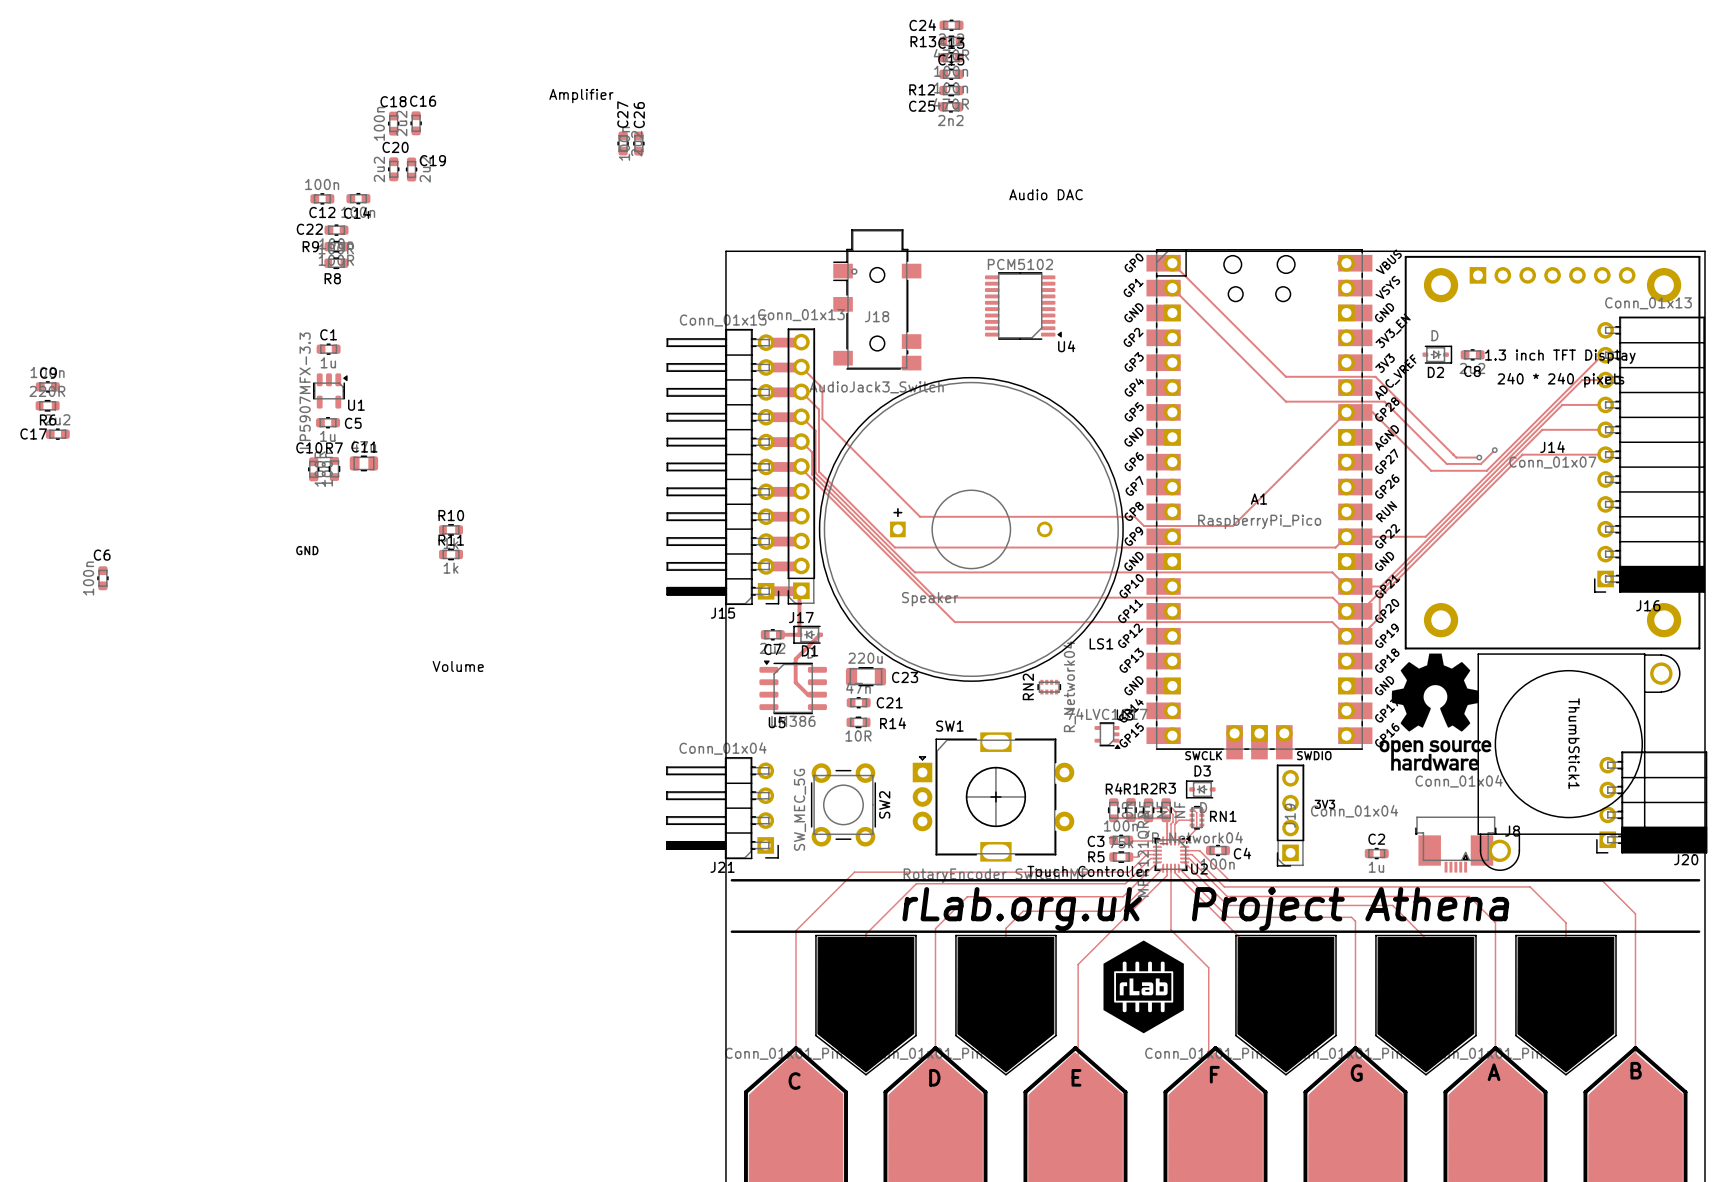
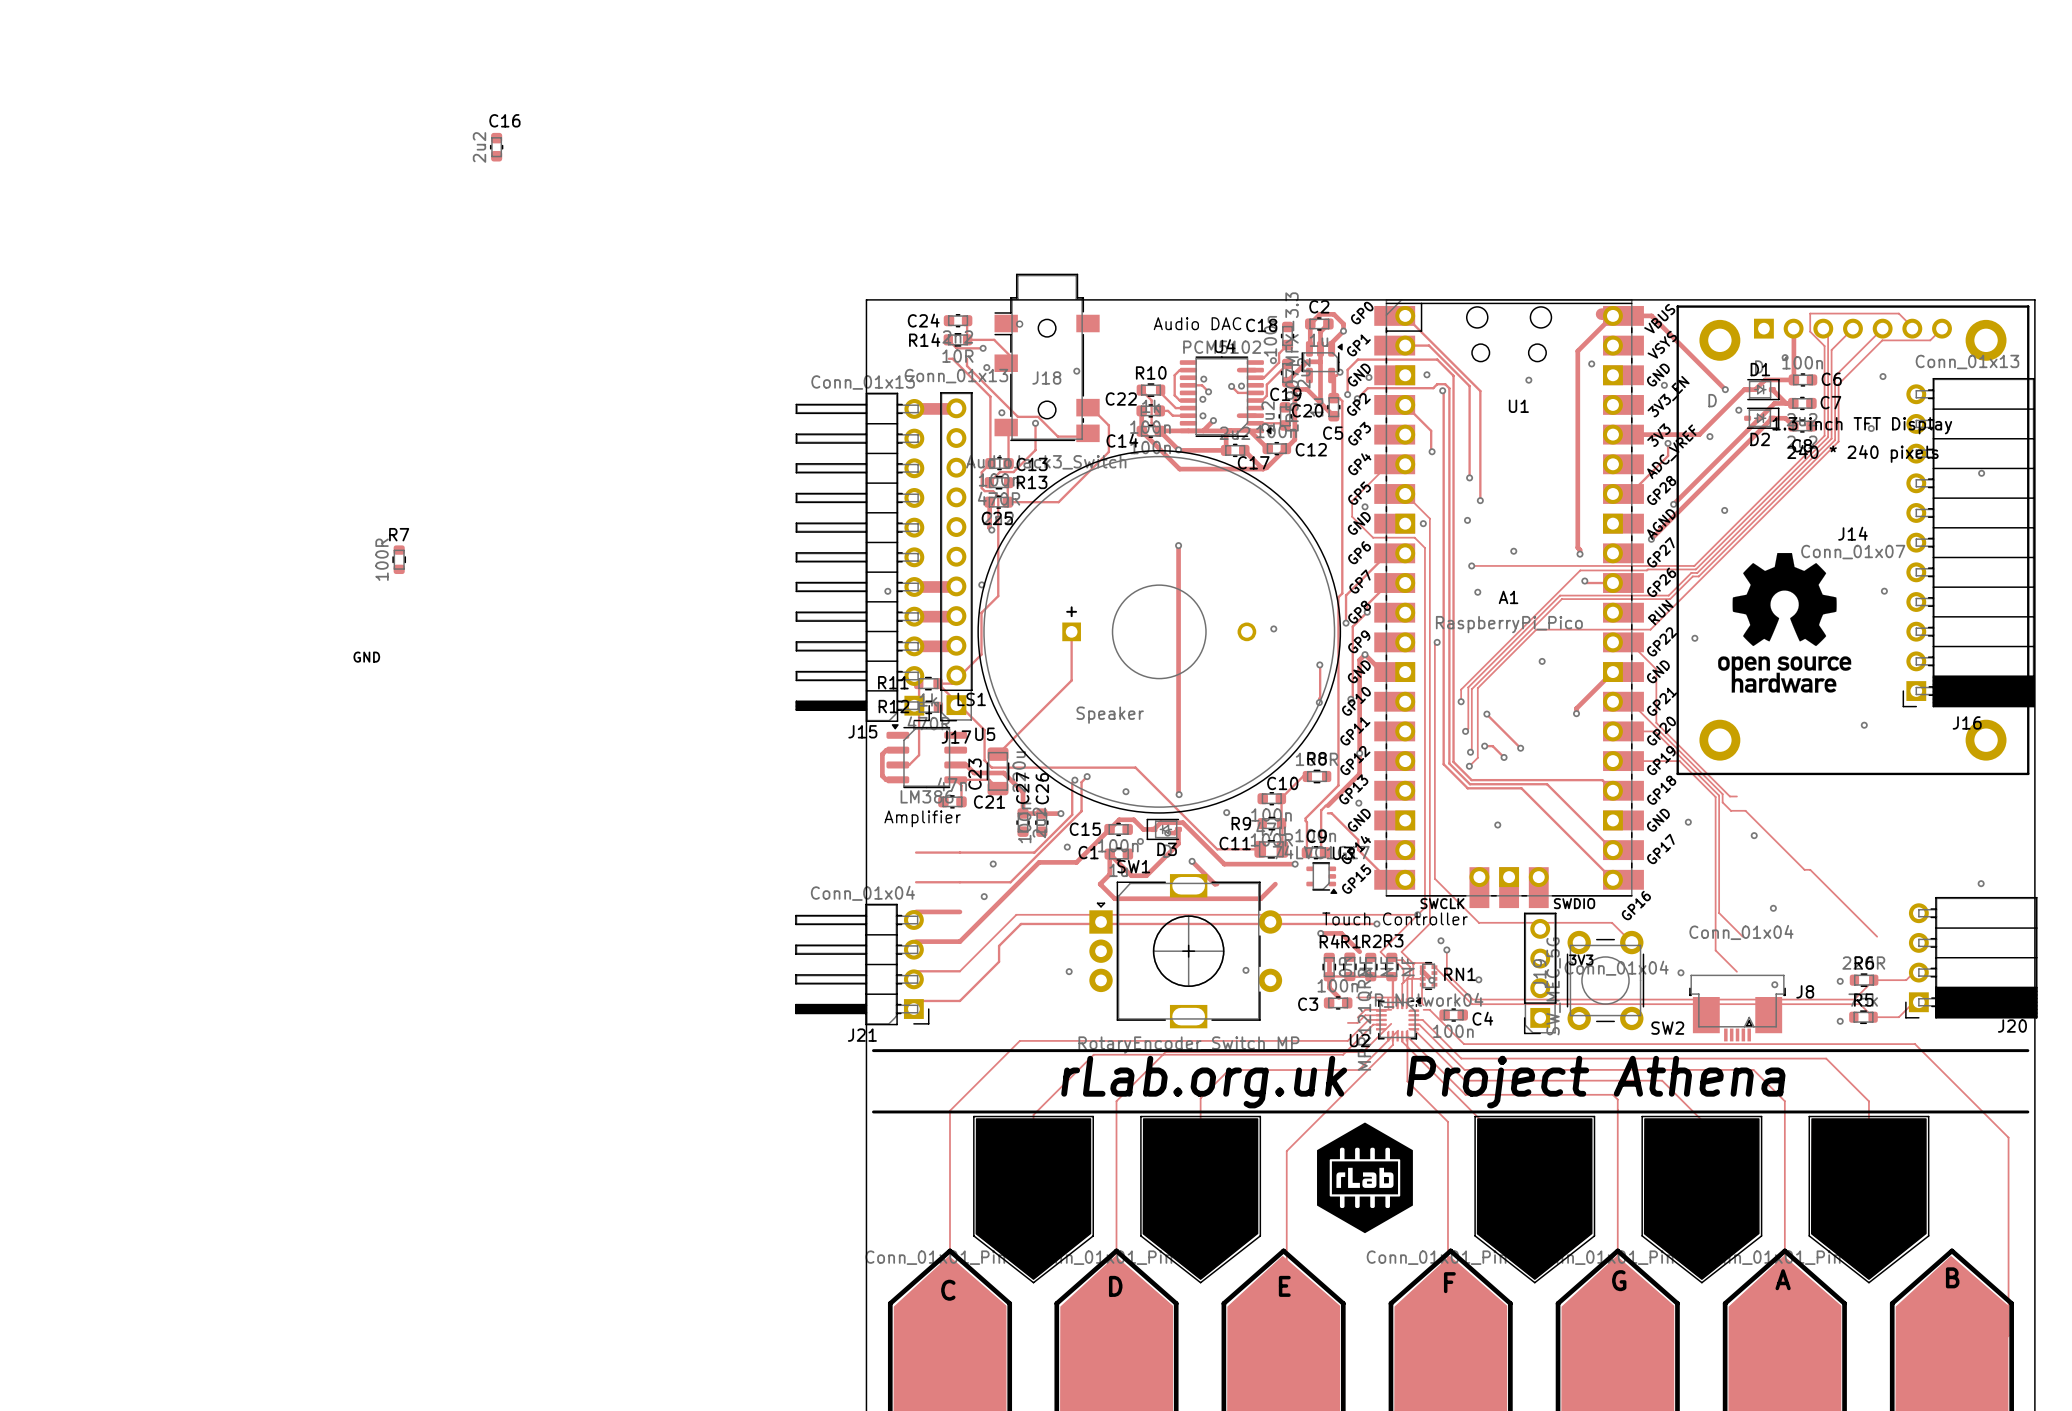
C24 position: (951, 25) -> (958, 320)
R13 name position: R13 (923, 41) -> R13 (1032, 482)
R13 position: (951, 41) -> (999, 482)
C13 name position: C13 (951, 43) -> C13 (1032, 464)
C13 position: (951, 57) -> (999, 463)
C15 name position: C15 (951, 59) -> C15 (1085, 829)
C15 position: (951, 74) -> (1118, 829)
R12 position: (951, 90) -> (928, 707)
text: Amplifier (581, 96) -> none
C18 name position: C18 (393, 101) -> C18 (1261, 325)
C25 name position: C25 (922, 106) -> C25 (997, 518)
C25 position: (951, 106) -> (998, 502)
C18 position: (393, 123) -> (1287, 336)
C27 position: (623, 143) -> (1023, 822)
C26 position: (638, 143) -> (1041, 822)
C20 name position: C20 (395, 147) -> C20 (1307, 410)
C19 name position: C19 (432, 160) -> C19 (1285, 394)
C20 position: (393, 169) -> (1285, 416)
C19 position: (411, 169) -> (1287, 373)
text position: Audio DAC (1046, 194) -> Audio DAC (1197, 323)
C12 position: (322, 198) -> (1276, 448)
C14 position: (358, 198) -> (1150, 431)
C12 name position: C12 (322, 212) -> C12 (1311, 449)
C14 name position: C14 (357, 213) -> C14 (1122, 440)
C22 name position: C22 (309, 229) -> C22 (1121, 399)
C22 position: (336, 230) -> (1150, 410)
R9 position: (336, 246) -> (1271, 823)
A1 footprint: [1146, 249, 1373, 760] -> [1374, 299, 1644, 909]
R8 position: (336, 263) -> (1317, 776)
track: (1172, 263) (1285, 376) (1375, 376) (1456, 457) (1479, 457) -> none
track: none -> (1405, 315) (1480, 391) (1480, 500)
track: none -> (967, 320) (967, 339) (994, 339) (1012, 358) (1012, 366)
track: none -> (1328, 323) (1320, 331) (1320, 402)
track: none -> (1794, 327) (1793, 379) (1765, 379) (1755, 389) (1744, 389) (1699, 434) (1612, 434)
track: none -> (1824, 327) (1828, 331) (1828, 437) (1695, 569) (1580, 570) (1461, 689) (1461, 701)
track: none -> (1853, 327) (1831, 350) (1831, 438) (1697, 572) (1691, 572) (1668, 595) (1560, 595) (1468, 687) (1468, 728) (1465, 731)
track: none -> (1883, 327) (1835, 376) (1835, 440) (1698, 576) (1692, 576) (1670, 599) (1561, 599) (1471, 689) (1470, 752)
track: none -> (1913, 327) (1898, 313) (1810, 313) (1810, 331) (1824, 346) (1824, 435) (1694, 565) (1471, 565)
track: none -> (1942, 327) (1930, 340) (1882, 340) (1838, 384) (1838, 441) (1650, 629) (1536, 629) (1477, 688) (1477, 757) (1469, 766)
via: none -> (1343, 331)
R8 name position: R8 (332, 278) -> R8 (1317, 758)
track: none -> (948, 339) (956, 348) (983, 348)
track: (1172, 288) (1285, 401) (1384, 401) (1446, 463) (1480, 463) (1494, 450) -> none
track: none -> (1287, 345) (1279, 353) (1279, 362) (1263, 377) (1255, 377)
track: none -> (1405, 345) (1429, 345) (1469, 386) (1469, 477)
via: none -> (983, 348)
track: none -> (1309, 348) (1310, 323) (1319, 314) (1333, 314) (1343, 323) (1343, 331) (1331, 343) (1331, 348)
via: none -> (1785, 357)
track: none -> (948, 358) (952, 358) (990, 396) (990, 463) (981, 472) (981, 488) (984, 491) (993, 491) (998, 496) (998, 596) (981, 612) (981, 654) (952, 683) (938, 683) (984, 730) (984, 760) (991, 767) (1135, 767) (1217, 849) (1260, 849)
track: none -> (966, 358) (966, 365) (1017, 416) (1038, 416) (1057, 436) (1094, 436)
via: none -> (1273, 360)
track: none -> (1320, 361) (1307, 361) (1287, 381) (1294, 389)
track: none -> (1287, 363) (1266, 384) (1266, 395) (1262, 400) (1255, 400)
via: none -> (1591, 363)
U4 position: (1023, 305) -> (1225, 396)
via: none -> (986, 367)
track: none -> (1188, 370) (1179, 370) (1174, 375) (1174, 395) (1179, 400) (1188, 400)
track: none -> (1239, 370) (1255, 370)
via: none -> (1076, 371)
track: none -> (1340, 372) (1336, 375) (1331, 375) (1333, 377) (1333, 398)
via: none -> (1340, 372)
via: none -> (1426, 374)
via: none -> (1882, 376)
via: none -> (1369, 377)
via: none -> (1203, 379)
via: none -> (1528, 380)
track: none -> (1188, 385) (1202, 385) (1208, 391)
via: none -> (1664, 385)
track: none -> (1231, 386) (1238, 392) (1255, 392)
via: none -> (1231, 386)
via: none -> (1241, 386)
track: none -> (1141, 390) (1151, 400) (1151, 422) (1159, 431)
track: none -> (1160, 390) (1160, 392) (1175, 408) (1188, 408)
track: none -> (1294, 389) (1294, 439) (1266, 467) (1261, 467) (1244, 450)
track: none -> (1294, 389) (1307, 389) (1333, 416)
track: none -> (1725, 389) (1651, 315) (1612, 315) (1577, 351) (1577, 547) (1580, 554)
via: none -> (1725, 389)
track: none -> (1772, 389) (1786, 403)
track: none -> (1442, 390) (1443, 764) (1467, 788) (1521, 788) (1612, 879)
via: none -> (1442, 390)
via: none -> (1208, 391)
track: none -> (1347, 394) (1347, 369) (1357, 359) (1437, 359) (1453, 375) (1453, 761) (1471, 780) (1602, 780) (1612, 790)
via: none -> (1347, 394)
track: none -> (1333, 398) (1339, 398) (1342, 401) (1342, 593) (1338, 597) (1338, 785) (1305, 818) (1306, 852)
C1 name position: C1 (328, 334) -> C1 (1088, 852)
via: none -> (1202, 399)
track: none -> (1357, 398) (1367, 388) (1433, 388) (1437, 384) (1445, 384) (1449, 388) (1449, 763) (1470, 784) (1547, 784) (1612, 850)
via: none -> (1357, 398)
track: none -> (1405, 404) (1431, 430) (1432, 451)
track: none -> (1791, 405) (1793, 403) (1774, 403) (1673, 504)
via: none -> (1738, 410)
track: none -> (1094, 410) (1108, 425) (1108, 451) (1058, 502) (1007, 502) (1008, 482)
track: none -> (1141, 410) (1141, 431) (1179, 469) (1264, 467)
track: none -> (1159, 410) (1168, 410) (1172, 415) (1188, 415)
via: none -> (1001, 412)
U4 name position: U4 (1066, 346) -> U4 (1225, 346)
via: none -> (1202, 415)
track: none -> (1239, 415) (1255, 415)
C1 position: (328, 349) -> (1118, 854)
track: none -> (1213, 420) (1203, 430)
via: none -> (1213, 420)
track: none -> (1035, 423) (1035, 450) (1013, 472) (999, 472) (989, 482)
via: none -> (1035, 423)
track: none -> (1255, 423) (1283, 423) (1285, 425)
D2 position: (1437, 354) -> (1761, 418)
C8 position: (1472, 354) -> (1802, 425)
track: (1605, 355) (1602, 355) (1486, 470) (1431, 470) (1372, 412) (1346, 412) (1232, 525) (1144, 525) (1134, 516) (920, 516) (822, 419) (822, 388) (801, 367) (766, 367) -> none
track: none -> (1793, 425) (1785, 418) (1772, 418) (1651, 539)
via: none -> (1871, 428)
track: none -> (1012, 430) (1008, 434) (1008, 463)
track: none -> (1159, 431) (1179, 450) (1226, 450) (1226, 434) (1229, 430) (1249, 430) (1267, 448)
track: none -> (1229, 430) (1159, 431)
via: none -> (1709, 436)
track: none -> (1668, 443) (1668, 455) (1630, 493) (1612, 493)
via: none -> (1668, 443)
via: none -> (1178, 449)
via: none -> (1432, 451)
track: (1605, 380) (1582, 380) (1425, 536) (1346, 536) (1335, 547) (894, 547) (818, 471) (818, 409) (801, 391) (766, 392) -> none
C9 position: (47, 386) -> (1316, 852)
track: none -> (1405, 464) (1388, 464) (1352, 500) (1352, 516) (1373, 537) (1414, 537) (1424, 547) (1424, 907) (1380, 951) (1388, 960) (1403, 960) (1409, 966) (1409, 975) (1407, 978) (1407, 998)
U1 position: (330, 390) -> (1322, 362)
via: none -> (1981, 473)
via: none -> (1469, 477)
track: (1605, 404) (1562, 404) (1380, 586) (1346, 586) (1332, 572) (914, 572) (815, 473) (815, 430) (801, 416) (766, 417) -> none
R6 position: (47, 405) -> (1864, 980)
U1 name position: U1 (356, 405) -> U1 (1518, 406)
track: none -> (1405, 493) (1429, 518) (1429, 923) (1401, 951) (1413, 963) (1412, 998)
R6 name position: R6 (48, 419) -> R6 (1864, 963)
via: none -> (1480, 500)
track: none -> (989, 502) (989, 527) (991, 530)
C5 rotation: 0° (328, 422) -> 90° clockwise (1333, 407)
C5 position: (328, 422) -> (1333, 407)
via: none -> (1673, 504)
via: none -> (1365, 506)
via: none -> (1724, 510)
track: (1605, 429) (1542, 429) (1360, 611) (1346, 611) (1332, 597) (935, 597) (812, 474) (812, 452) (801, 441) (766, 442) -> none
C17 name position: C17 (33, 433) -> C17 (1253, 462)
C17 position: (57, 434) -> (1235, 450)
via: none -> (1467, 520)
via: none -> (1423, 523)
via: none -> (991, 530)
C11 name position: C11 (364, 447) -> C11 (1235, 843)
via: (1494, 450) -> none
via: none -> (1651, 539)
track: (1605, 454) (1522, 454) (1379, 597) (1379, 617) (1360, 636) (1346, 636) (1332, 622) (954, 622) (801, 466) (766, 466) -> none
track: none -> (1178, 545) (1179, 794)
via: none -> (1178, 545)
via: (1479, 457) -> none
via: none -> (1513, 551)
C11 position: (363, 463) -> (1271, 849)
track: none -> (1405, 553) (1388, 553) (1346, 595) (1346, 623)
via: none -> (1580, 554)
C10 rotation: 0° (313, 469) -> 90° clockwise (1271, 798)
C10 position: (313, 469) -> (1271, 798)
via: none -> (1471, 565)
track: none -> (1584, 581) (1586, 583) (1612, 583)
via: none -> (1584, 581)
track: none -> (1405, 583) (1388, 583) (1367, 604) (1367, 612) (1352, 626) (1352, 697) (1350, 699)
via: none -> (981, 584)
via: none -> (887, 591)
via: none -> (1884, 591)
via: none -> (1477, 592)
via: none -> (1367, 612)
via: none -> (1346, 623)
via: none -> (1273, 628)
R10 position: (451, 529) -> (1150, 390)
track: none -> (1071, 631) (1071, 680) (998, 754)
via: none -> (1694, 638)
track: none -> (1437, 642) (1434, 644) (1434, 878) (1478, 922) (1612, 922) (1631, 942)
via: none -> (1437, 642)
track: none -> (1612, 642) (1629, 642) (1656, 669) (1656, 722) (1729, 796) (1736, 796)
R11 name position: R11 (451, 540) -> R11 (893, 682)
via: none -> (1365, 654)
R11 position: (451, 554) -> (928, 683)
via: none -> (1542, 661)
track: none -> (1319, 664) (1319, 702)
via: none -> (1319, 664)
track: none -> (1405, 672) (1382, 672) (1365, 654) (1359, 660) (1359, 773) (1321, 810) (1321, 848) (1325, 852)
track: none -> (1612, 672) (1576, 708) (1576, 713)
track: (801, 565) (766, 566) -> none
track: none -> (918, 683) (919, 755) (909, 764) (897, 764)
C6 rotation: 0° (102, 578) -> 90° clockwise (1802, 379)
C6 position: (102, 578) -> (1802, 379)
via: none -> (1350, 699)
via: none -> (1461, 701)
track: none -> (1612, 701) (1630, 701) (1722, 794) (1722, 802) (1731, 810) (1745, 810) (1804, 869) (1810, 869) (1877, 936)
via: none -> (1319, 702)
track: (766, 591) (801, 590) (799, 592) (799, 634) (780, 634) -> none
via: none -> (1576, 713)
track: none -> (1486, 714) (1520, 748)
via: none -> (1486, 714)
via: none -> (1864, 725)
via: none -> (1465, 731)
track: none -> (1612, 731) (1654, 731) (1719, 795) (1719, 913) (1742, 936)
track: none -> (1484, 746) (1492, 746) (1504, 757)
via: none -> (1484, 746)
via: none -> (1520, 748)
track: none -> (897, 750) (886, 750) (882, 754) (882, 775) (886, 779) (897, 779)
via: none -> (1470, 752)
via: none -> (1359, 753)
C7 position: (772, 634) -> (1802, 403)
D1 rotation: 0° (808, 634) -> 180° (1761, 389)
D1 position: (808, 634) -> (1761, 389)
track: (820, 634) (795, 659) (795, 682) (807, 694) (817, 694) -> none
via: none -> (1504, 757)
track: none -> (1612, 761) (1679, 761) (1715, 797) (1715, 950) (1736, 971)
track: none -> (955, 764) (966, 764) (974, 773) (1003, 773) (1023, 792) (1023, 813) (1041, 813)
via: none -> (1469, 766)
LS1 name position: LS1 (1101, 643) -> LS1 (971, 699)
C7 name position: C7 (772, 649) -> C7 (1830, 402)
track: none -> (1087, 776) (1081, 782) (1081, 811) (1010, 882) (916, 882)
via: none -> (1087, 776)
track: none -> (1307, 776) (1303, 776) (1280, 798) (1282, 849)
track: none -> (1074, 780) (1072, 782) (1072, 814) (1034, 852) (916, 852)
via: none -> (1074, 780)
track: none -> (998, 788) (989, 779) (955, 779) (961, 785) (961, 801)
via: none -> (1125, 791)
via: none -> (1179, 794)
text: Volume (458, 666) -> none
via: none -> (1358, 803)
C23 rotation: 0° (865, 676) -> 90° clockwise (998, 771)
C23 position: (865, 676) -> (998, 771)
C23 name position: C23 (905, 677) -> C23 (975, 774)
via: none -> (1226, 812)
track: none -> (1041, 813) (1060, 813)
via: none -> (1060, 813)
track: none -> (1327, 813) (1331, 813) (1358, 839) (1358, 849) (1388, 879) (1405, 879)
text: none -> Amplifier (922, 818)
U5 position: (793, 687) -> (926, 756)
RN2: R_Network04 (1049, 687) -> none
via: none -> (1688, 822)
via: none -> (1497, 825)
track: none -> (1167, 833) (1174, 833) (1178, 829) (1178, 843) (1146, 875) (1131, 875) (1109, 854) (1109, 874) (1100, 884) (1114, 898) (1260, 898) (1275, 884)
via: none -> (1167, 833)
via: none -> (1754, 835)
C21 position: (858, 702) -> (952, 801)
via: none -> (1140, 841)
via: none -> (1067, 847)
drawing position: (1435, 712) -> (1784, 622)
track: none -> (1192, 861) (1216, 884)
via: none -> (1192, 861)
U5 name position: U5 (777, 722) -> U5 (985, 734)
R14 position: (858, 722) -> (957, 339)
via: none -> (993, 864)
R14 name position: R14 (893, 723) -> R14 (924, 339)
track: none -> (1295, 864) (1224, 864) (1182, 822) (1160, 822) (1153, 829) (1143, 829) (1133, 819) (1119, 819) (1076, 862) (1039, 862) (959, 941) (916, 941)
via: none -> (1295, 864)
via: none -> (1981, 883)
via: none -> (984, 896)
via: none -> (1773, 908)
ThumbStick1: (1579, 762) -> none
track: none -> (916, 911) (959, 911)
track: none -> (1417, 914) (1016, 914) (959, 971) (916, 971)
via: none -> (1417, 914)
D3 name position: D3 (1202, 770) -> D3 (1167, 849)
track: none -> (1376, 923) (1021, 923) (999, 945) (999, 961) (959, 1000) (916, 1000)
via: none -> (1376, 923)
track: none -> (1320, 933) (1341, 933) (1359, 951)
via: none -> (1320, 933)
via: none -> (1440, 940)
D3 position: (1200, 789) -> (1164, 829)
track: none -> (1446, 949) (1446, 973) (1472, 999) (1854, 999) (1873, 980) (1906, 980) (1915, 971)
via: none -> (1446, 949)
track: (1148, 802) (1154, 808) (1166, 808) (1173, 814) (1171, 841) -> none
SW2 position: (843, 804) -> (1605, 980)
SW2 name rotation: 0° (884, 804) -> 90° clockwise (1667, 1028)
SW2 name position: SW2 (884, 804) -> SW2 (1667, 1028)
track: none -> (1329, 961) (1329, 988) (1338, 997)
track: none -> (1413, 964) (1430, 963) (1472, 1004) (1860, 1004) (1873, 1017) (1898, 1017) (1915, 1000)
track: (1192, 810) (1196, 812) (1196, 828) (1184, 841) (1178, 841) -> none
via: none -> (1245, 970)
via: none -> (1069, 971)
via: none -> (1680, 972)
via: none -> (1478, 979)
track: none -> (1431, 980) (1422, 970) (1422, 1003) (1423, 1005)
via: none -> (1431, 980)
via: none -> (1840, 981)
via: none -> (1774, 984)
track: none -> (1357, 997) (1398, 998)
track: (1128, 840) (1163, 841) -> none
track: none -> (1391, 1009) (1365, 1009) (1357, 1017)
track: (1184, 850) (1199, 850) (1229, 880) (1602, 880) (1635, 913) (1635, 1166) -> (1423, 1009) (1429, 1009) (1463, 1044) (1915, 1044) (2008, 1137) (2008, 1335) (1951, 1392)
C2 position: (1376, 853) -> (1319, 323)
via: none -> (1840, 1021)
R5 name position: R5 (1096, 856) -> R5 (1863, 1000)
R5 position: (1121, 857) -> (1863, 1017)
track: (1157, 862) (1123, 896) (967, 896) (935, 928) -> (1391, 1023) (1363, 1052) (1165, 1052) (1116, 1101) (1116, 1108)
track: (1163, 868) (1120, 911) (1023, 911) (1005, 928) -> (1398, 1030) (1358, 1070) (1228, 1070) (1200, 1098) (1200, 1108)
track: (1171, 868) (1171, 930) (1208, 967) (1208, 1159) (1213, 1164) -> (1407, 1030) (1407, 1081) (1447, 1121) (1447, 1389)
U2 name position: U2 (1199, 868) -> U2 (1359, 1040)
text position: Touch Controller (1088, 871) -> Touch Controller (1395, 918)
text position: rLab.org.uk Project Athena (1205, 909) -> rLab.org.uk Project Athena (1423, 1082)

